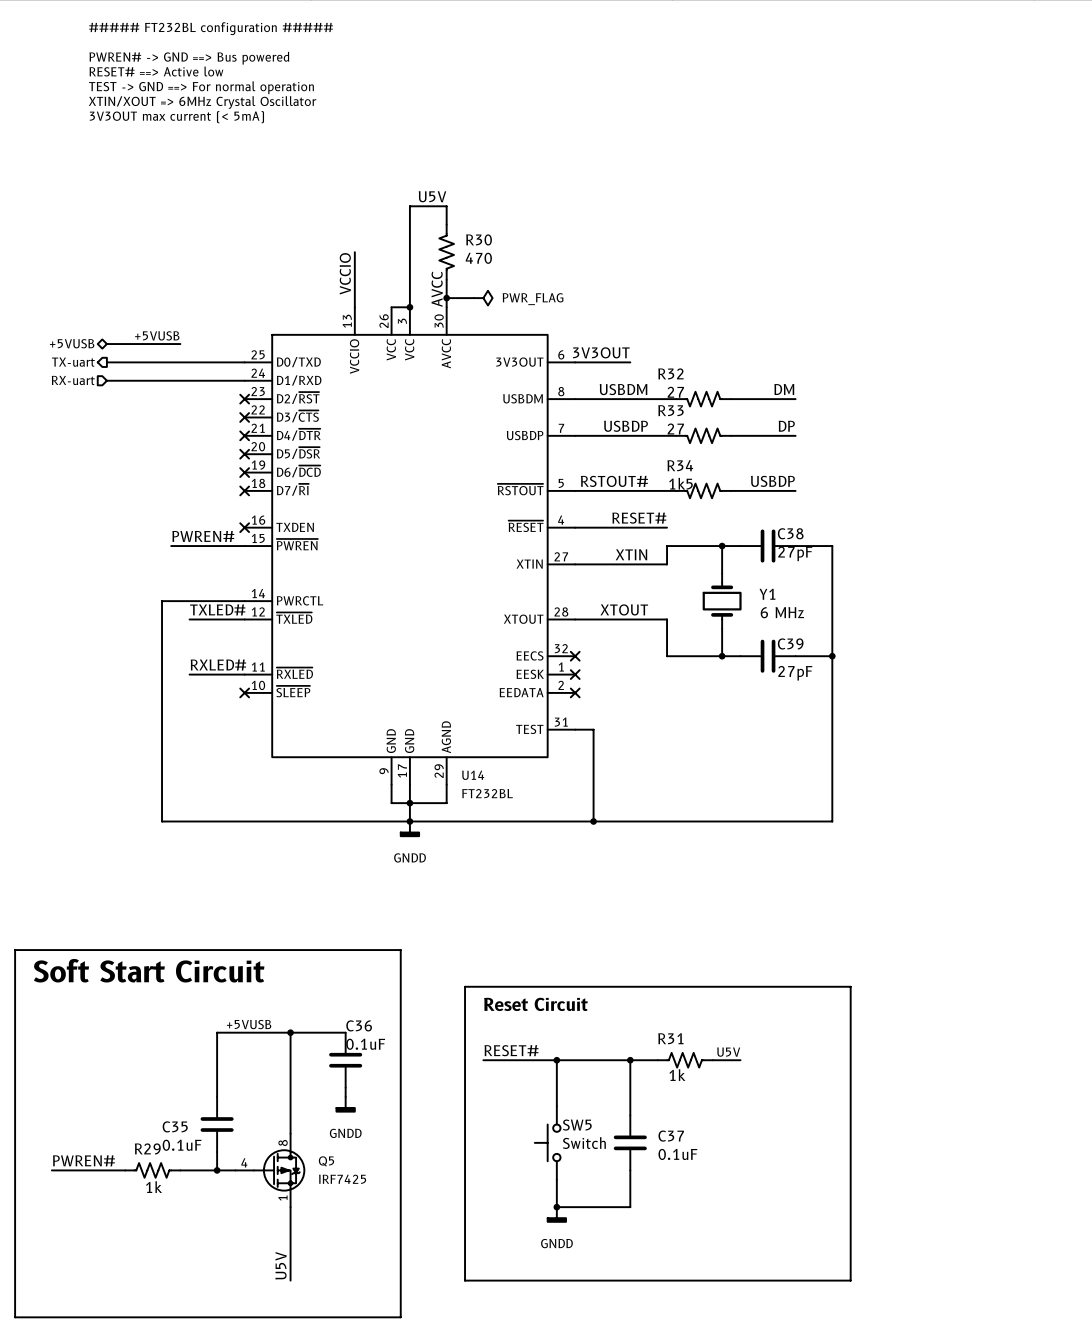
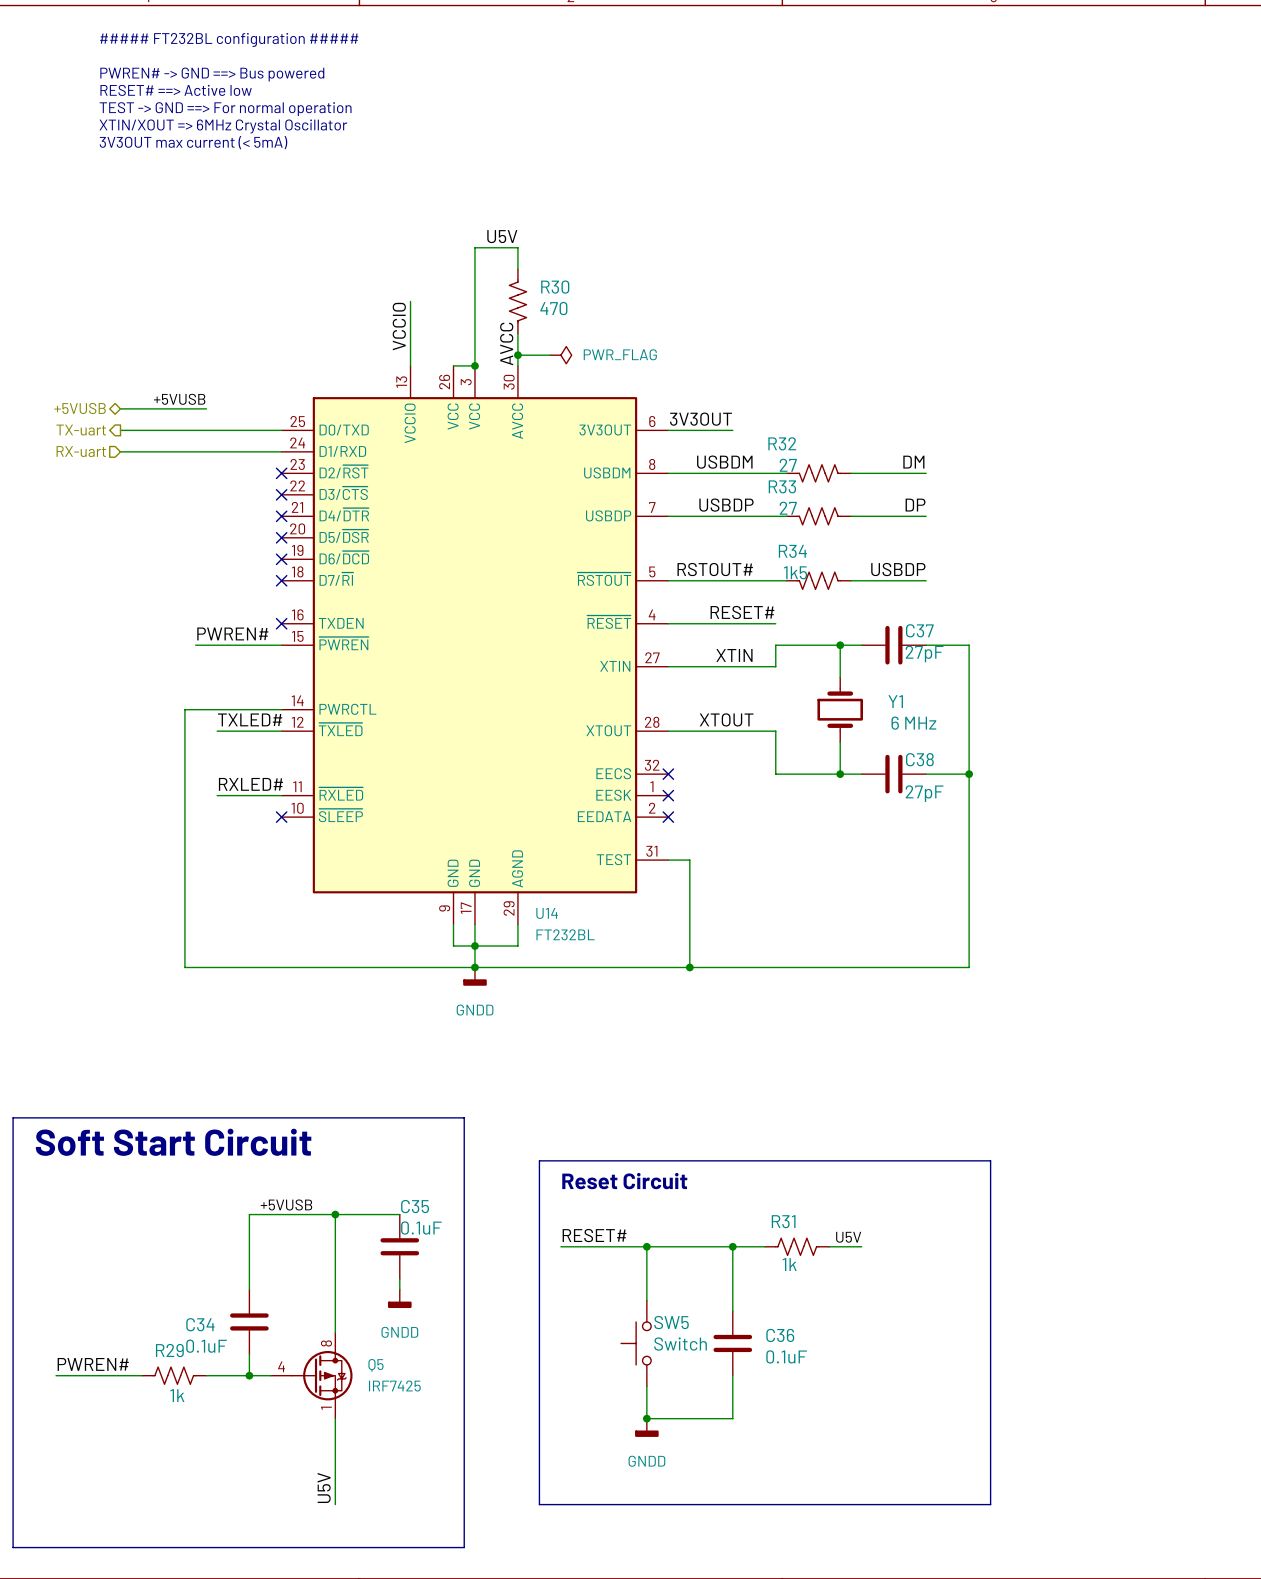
C38 name: C38 (790, 533) -> C37 (919, 630)
C39 name: C39 (790, 643) -> C38 (919, 759)
C36 name: C36 (359, 1025) -> C35 (415, 1206)
C35 name: C35 (175, 1126) -> C34 (200, 1324)
C37 name: C37 (671, 1136) -> C36 (780, 1335)

